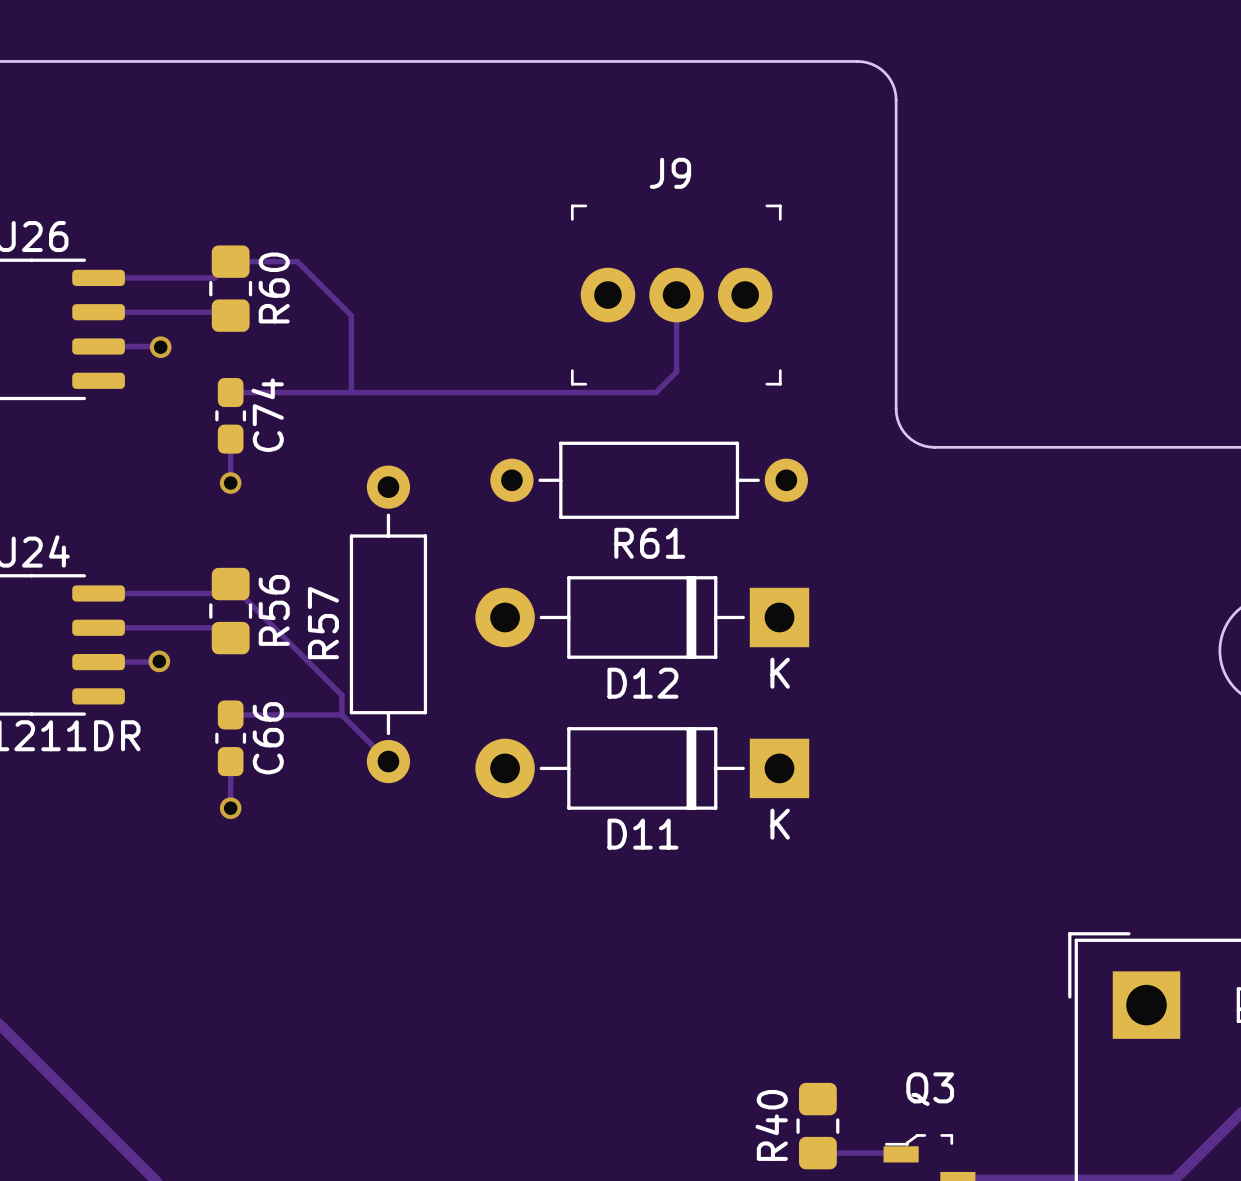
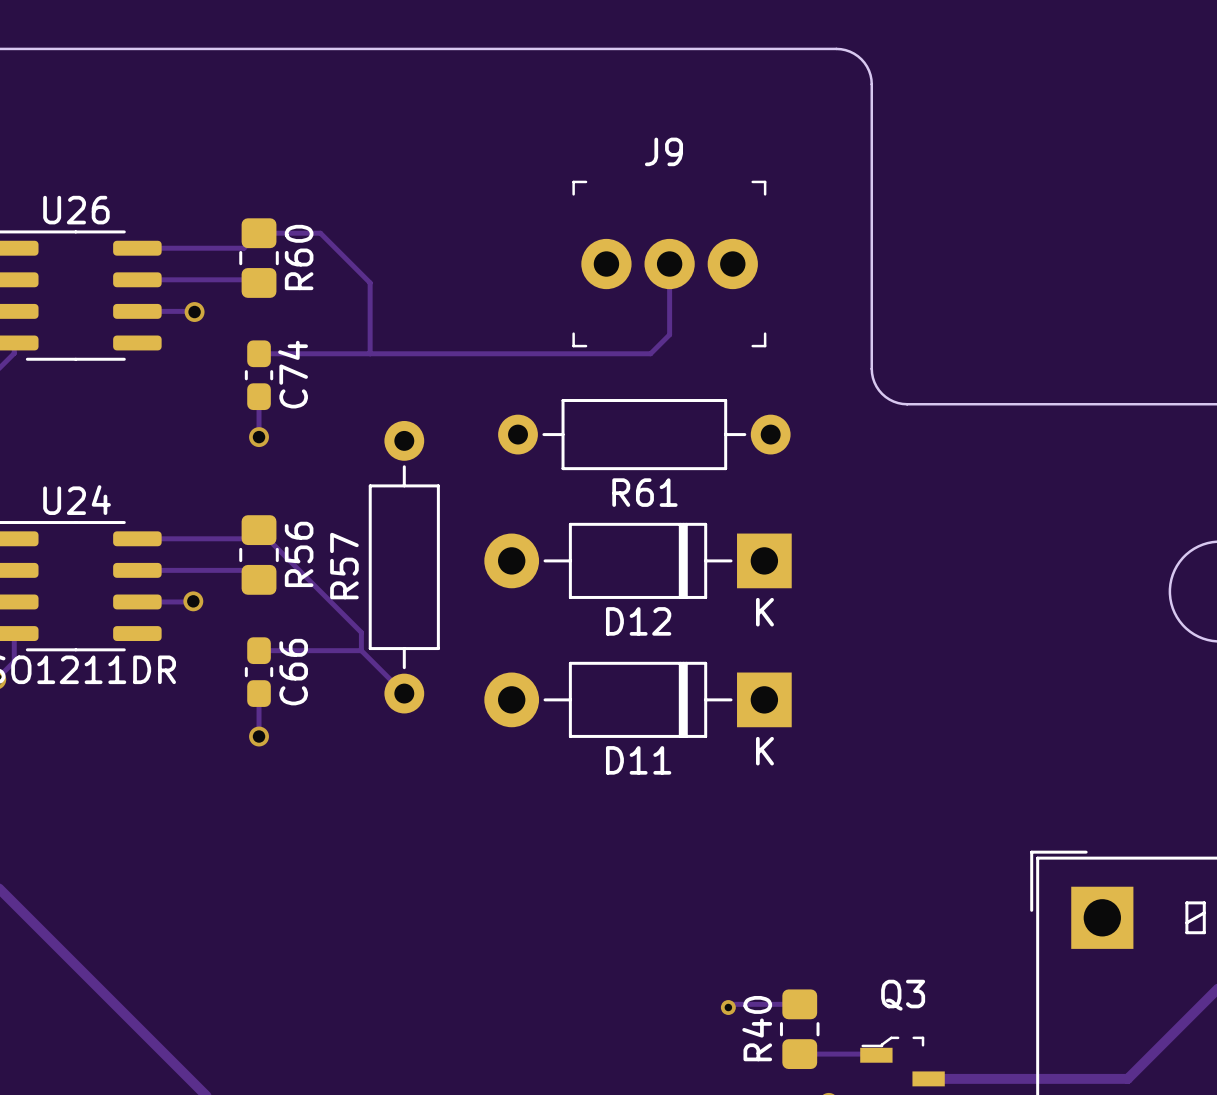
track: none -> (799, 1004) (731, 1004) (728, 1007)
via: none -> (728, 1007)

